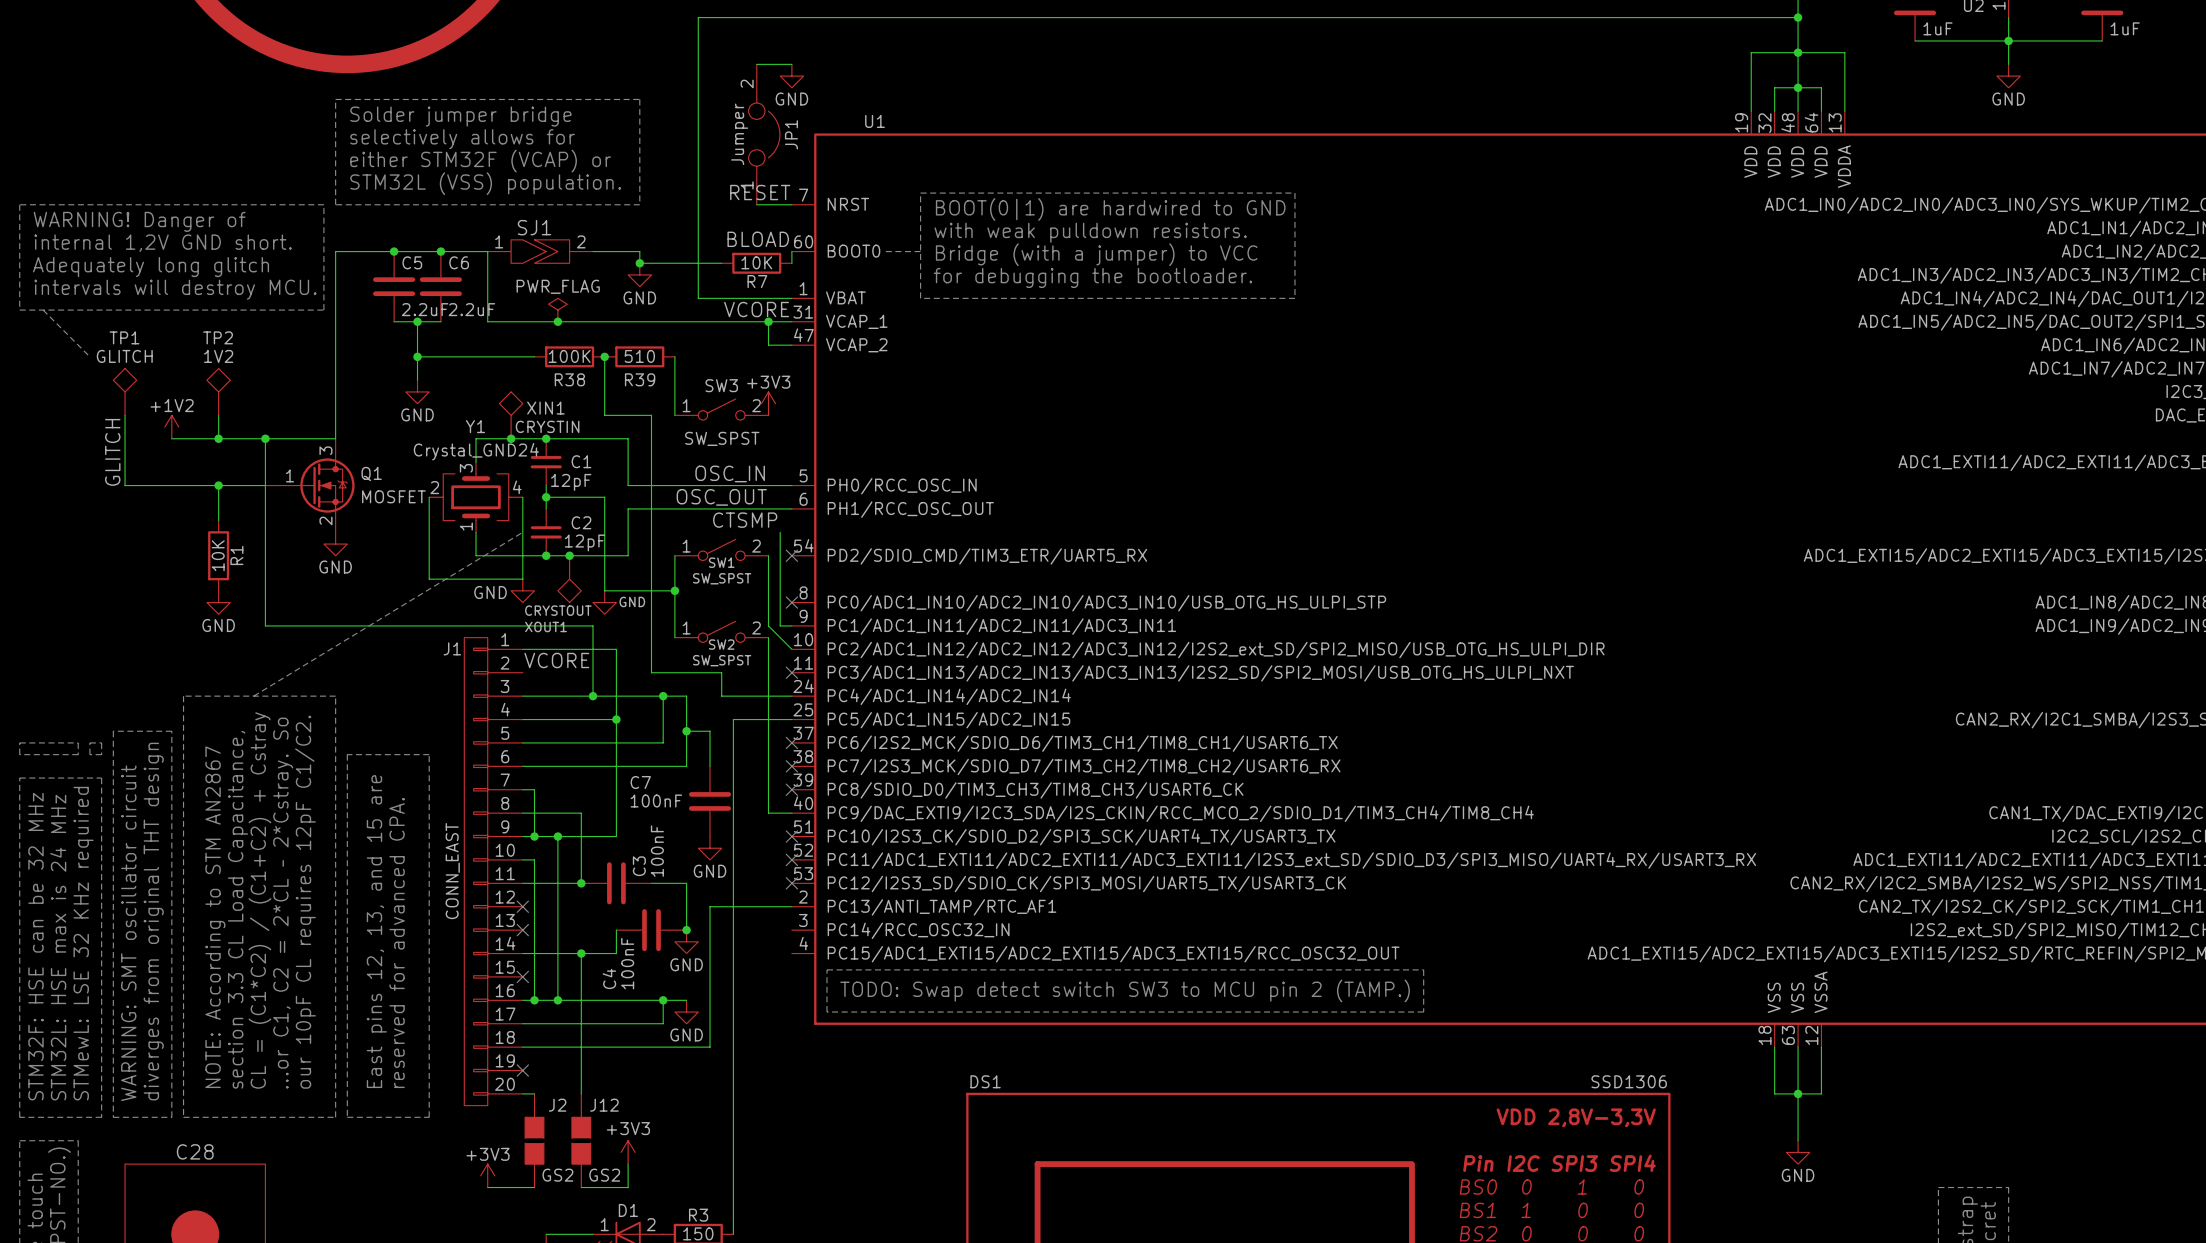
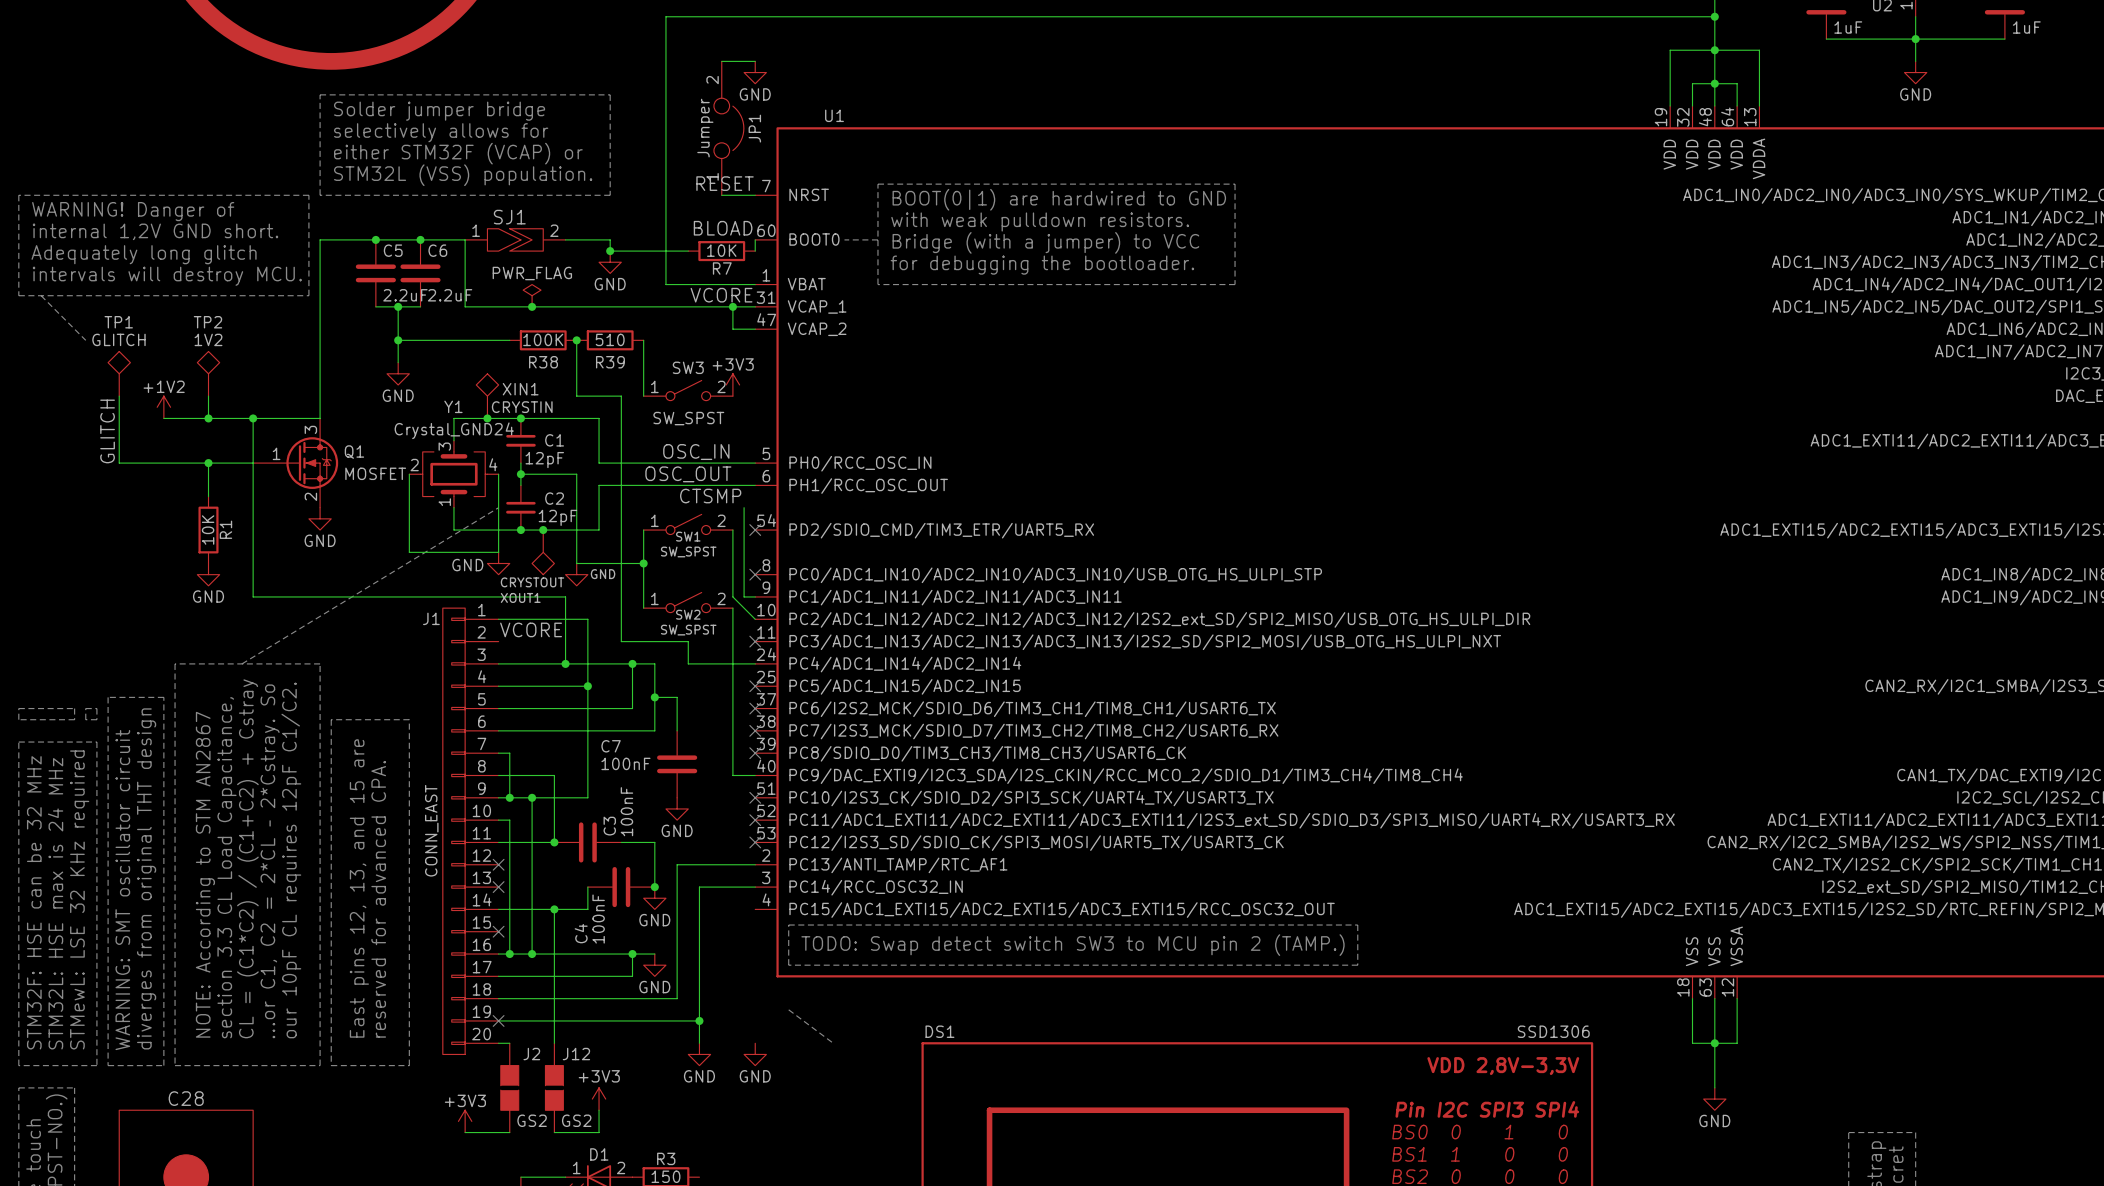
wire: (791, 719) (733, 719) (733, 930) -> (755, 887) (699, 887)
no-connect mark: none -> (755, 686)
line: none -> (788, 1009) (833, 1043)
wire: none -> (498, 1020) (699, 1020)
junction: none -> (699, 1020)
wire: (733, 1093) (733, 1234) -> none
power symbol: none -> GND (699, 1054)
power symbol: none -> GND (755, 1054)

